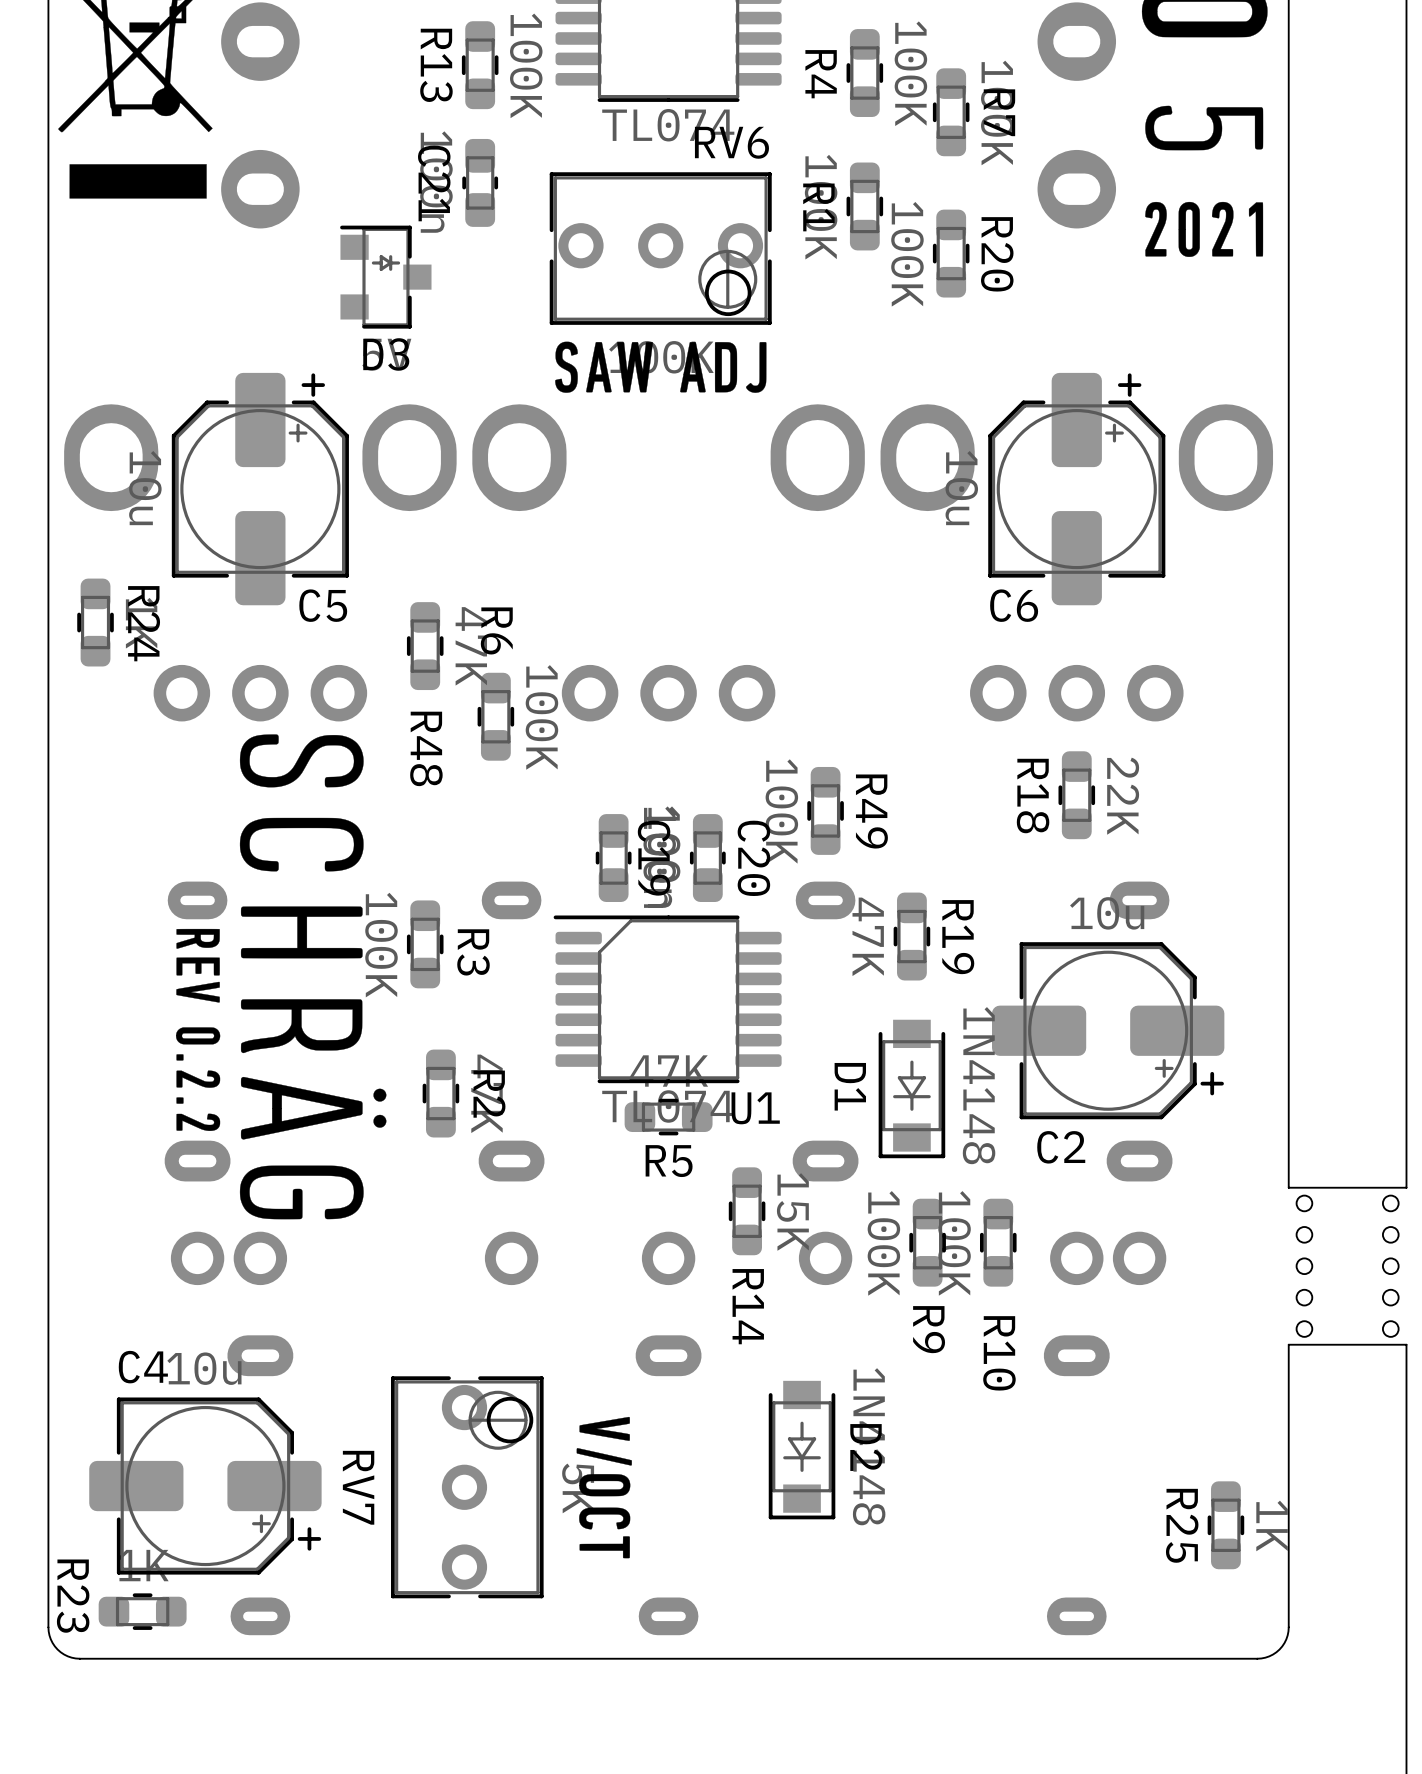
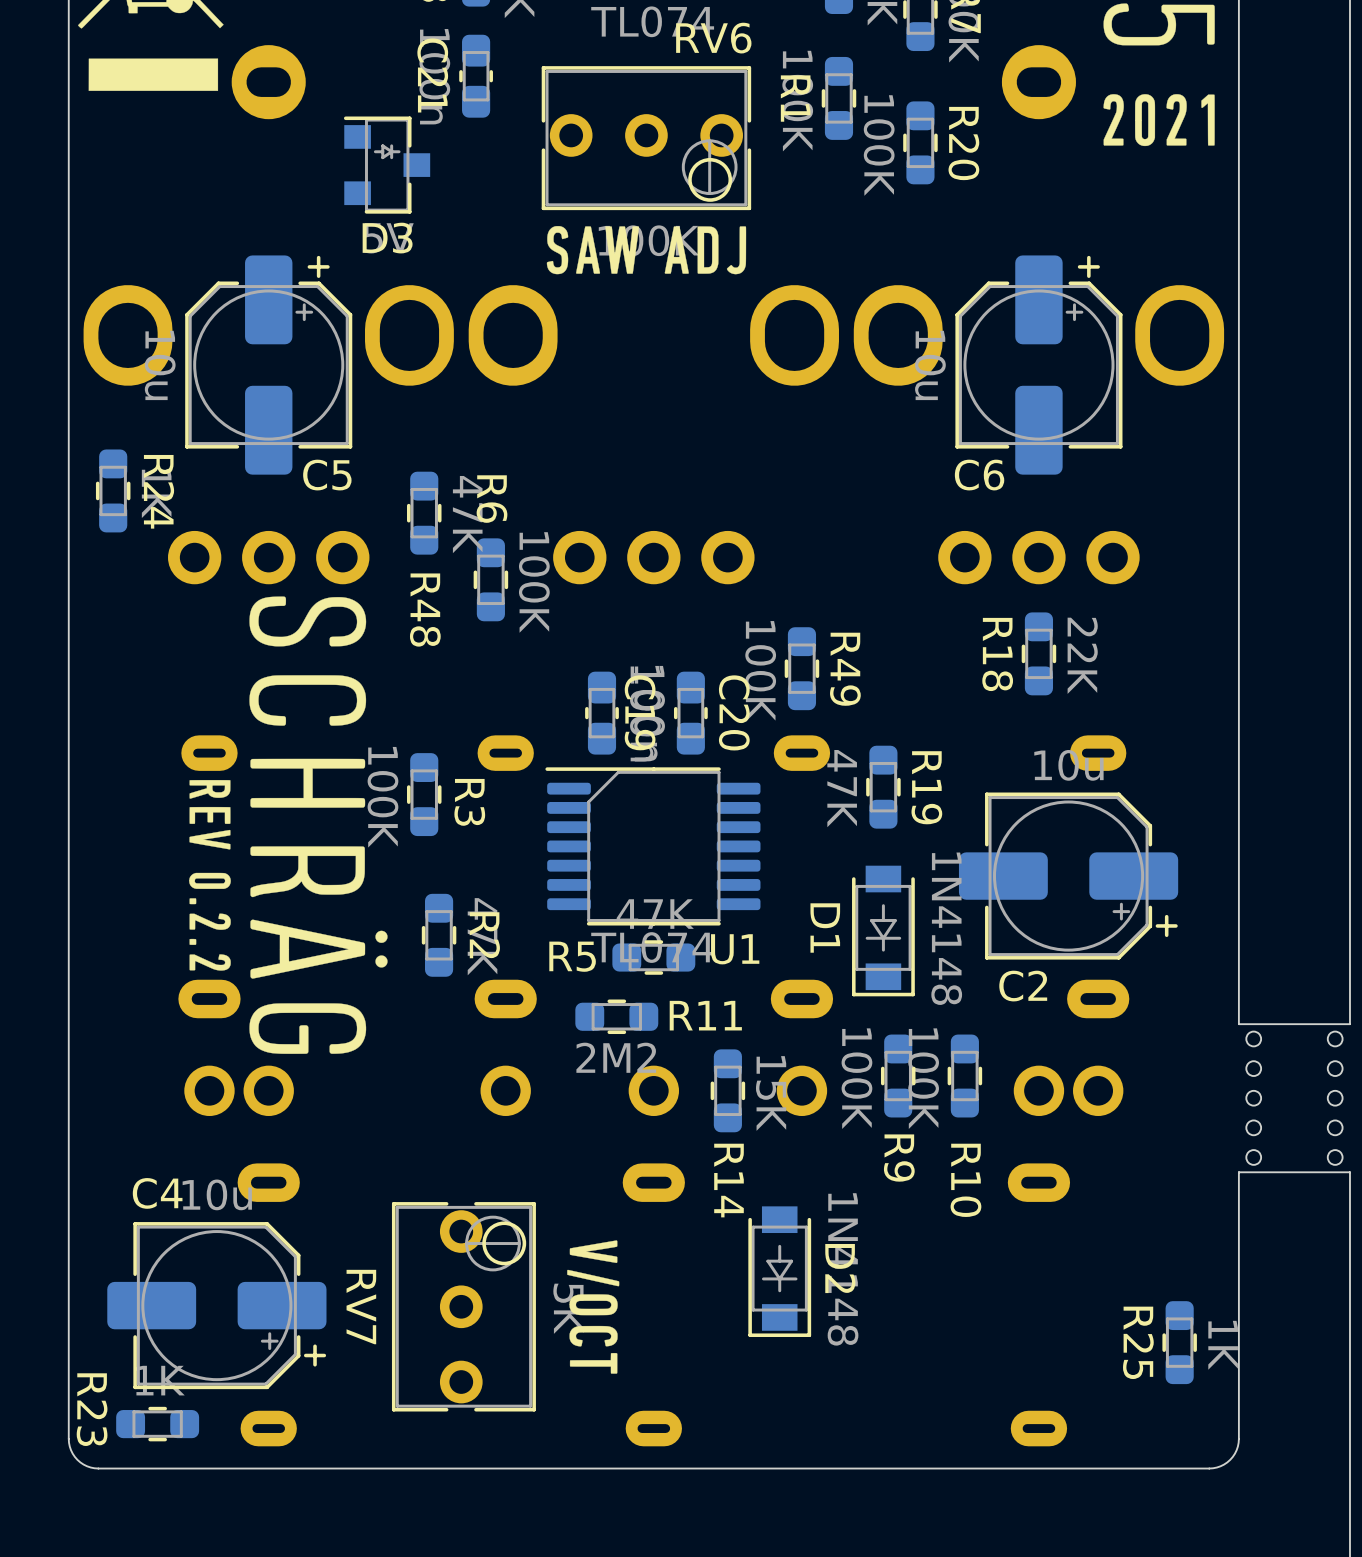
R5 name position: R5 (669, 1161) -> R5 (572, 956)
R11: none -> 2M2 (616, 1016)
R14 position: (747, 1211) -> (727, 1090)

